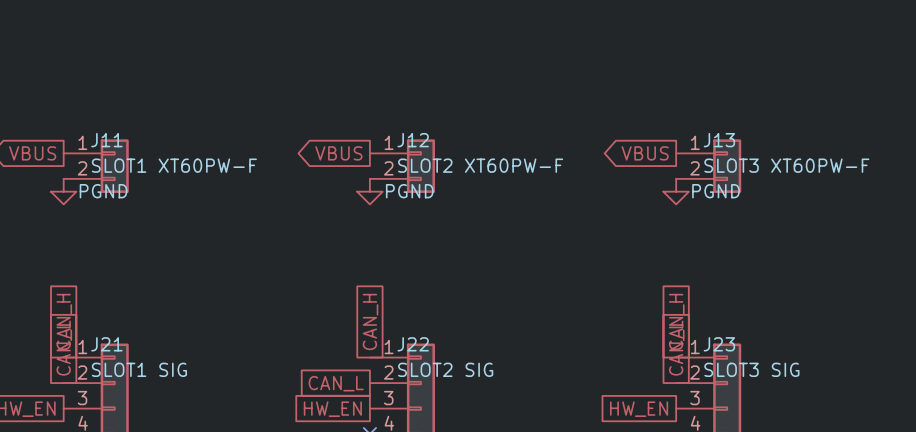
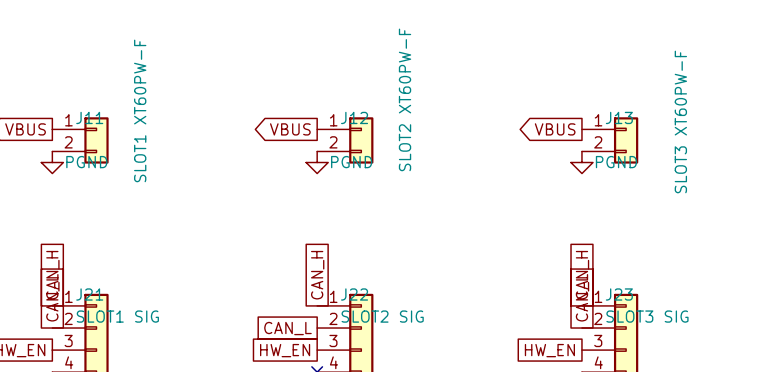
J11 value rotation: 0° (174, 165) -> 90° counterclockwise (140, 110)
J12 value rotation: 0° (480, 165) -> 90° counterclockwise (405, 99)
J13 value rotation: 0° (786, 165) -> 90° counterclockwise (680, 121)

